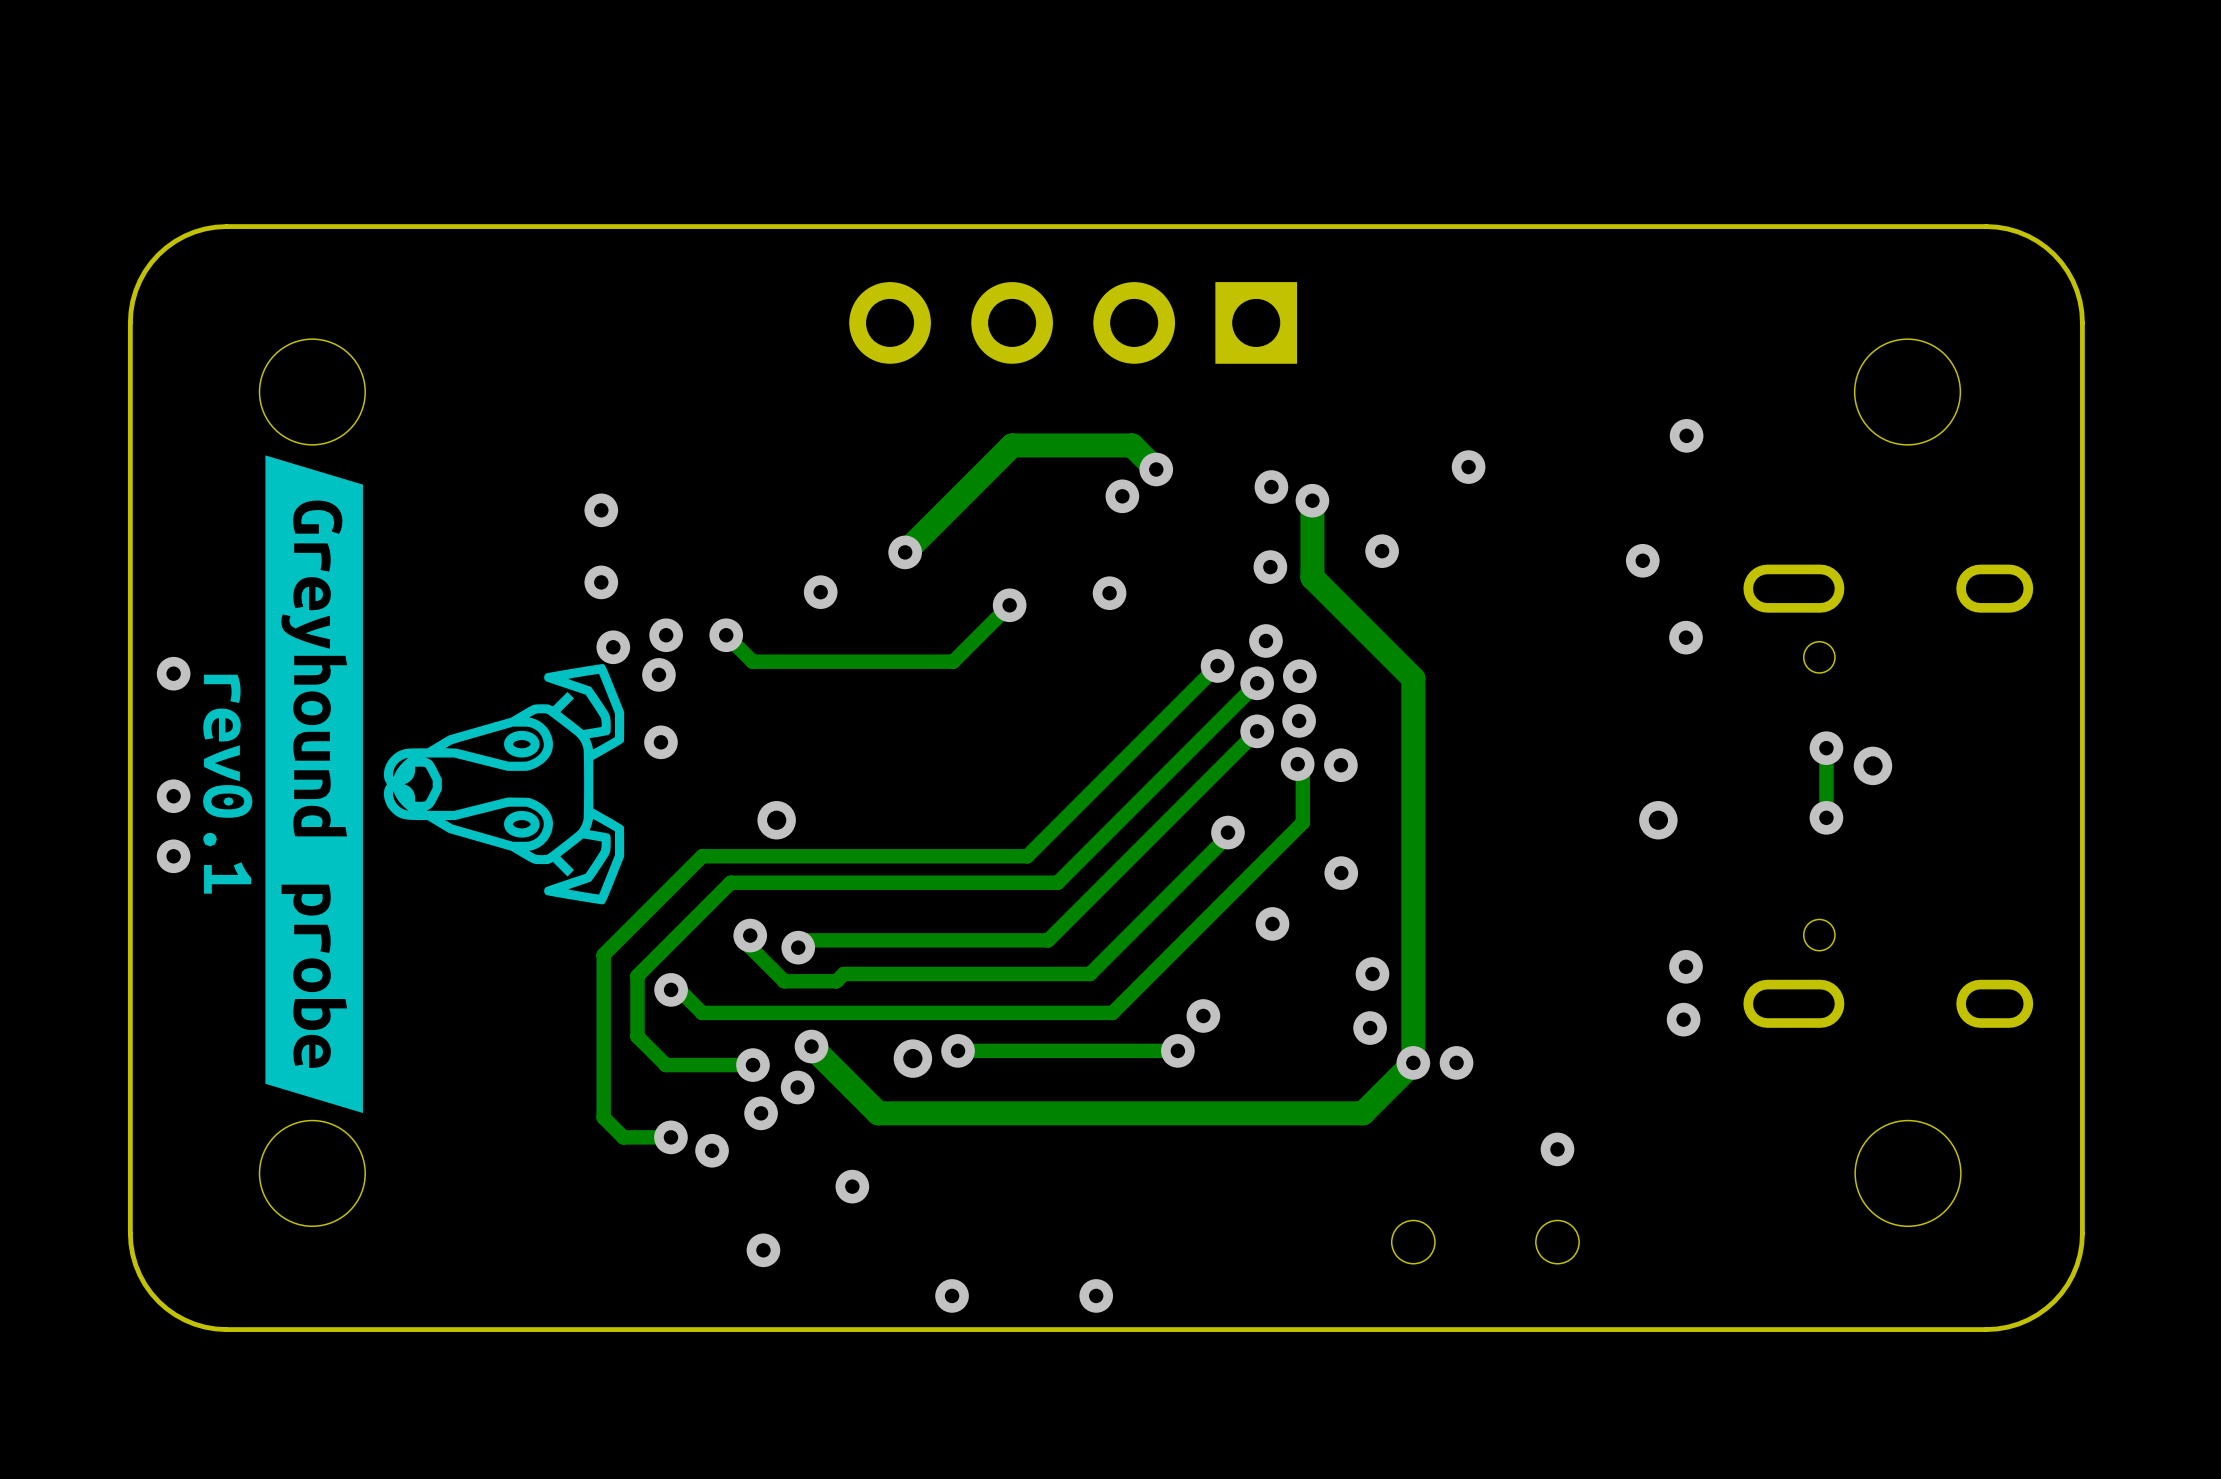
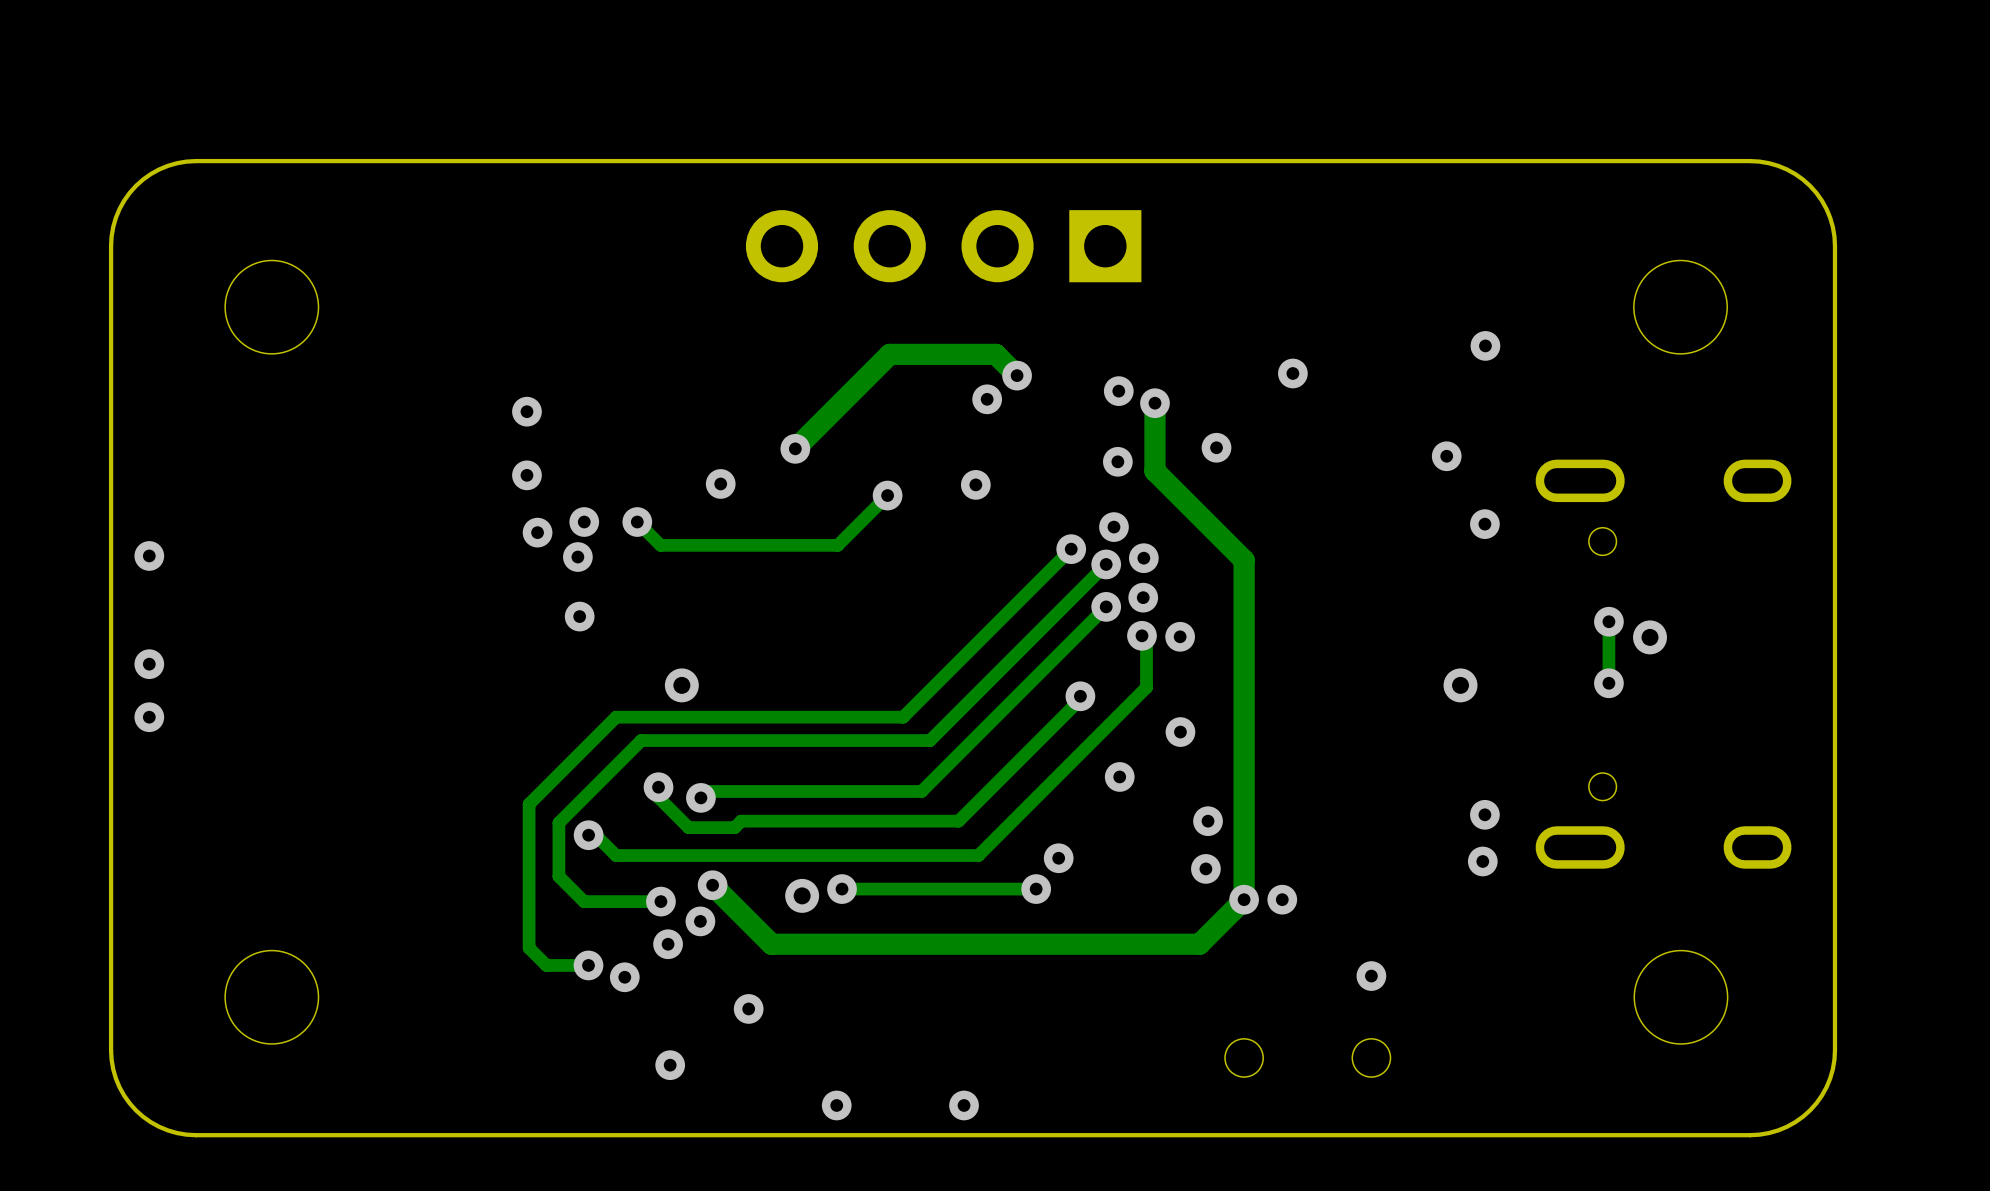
drawing: [203, 455, 625, 1114] -> none

